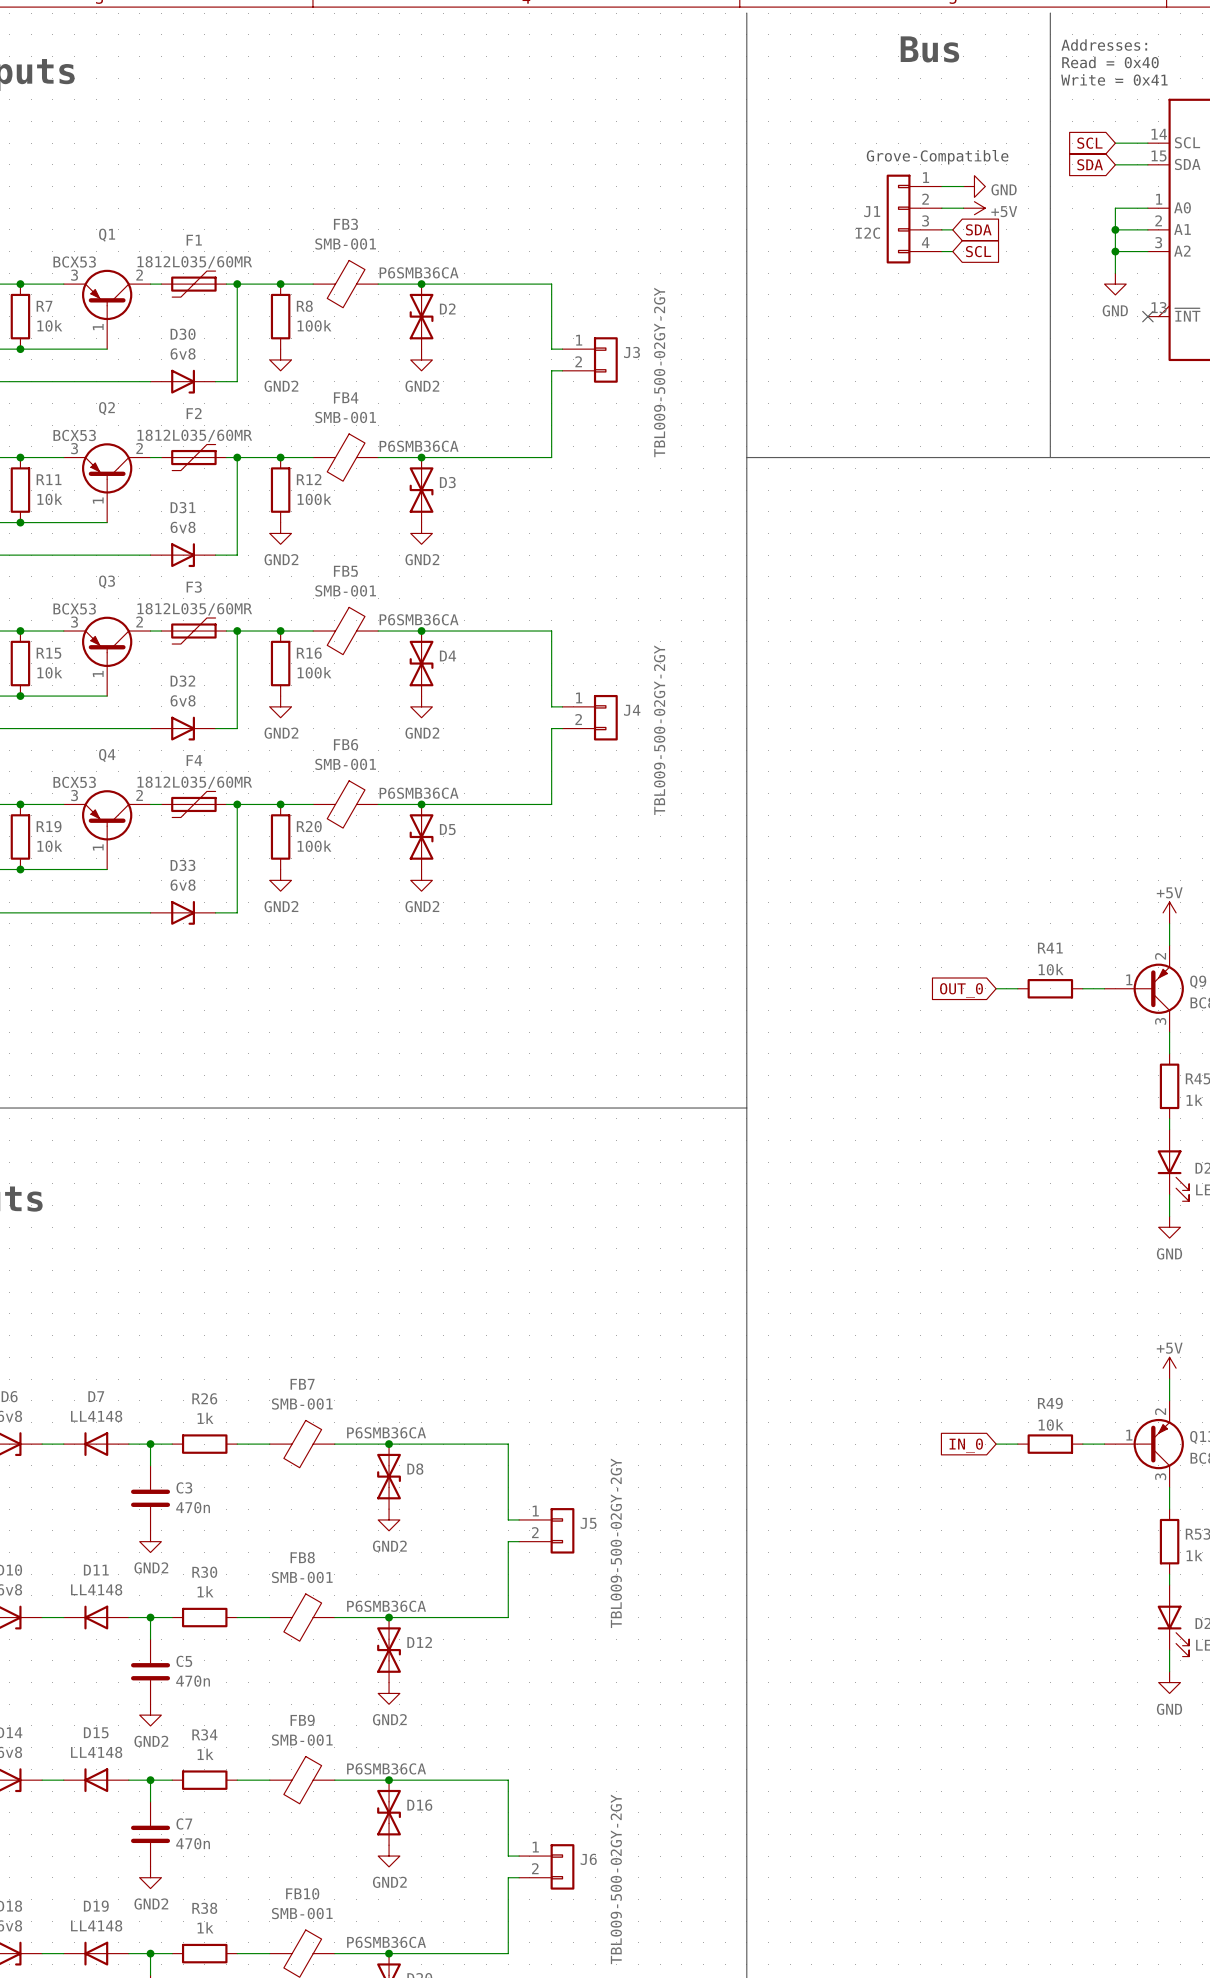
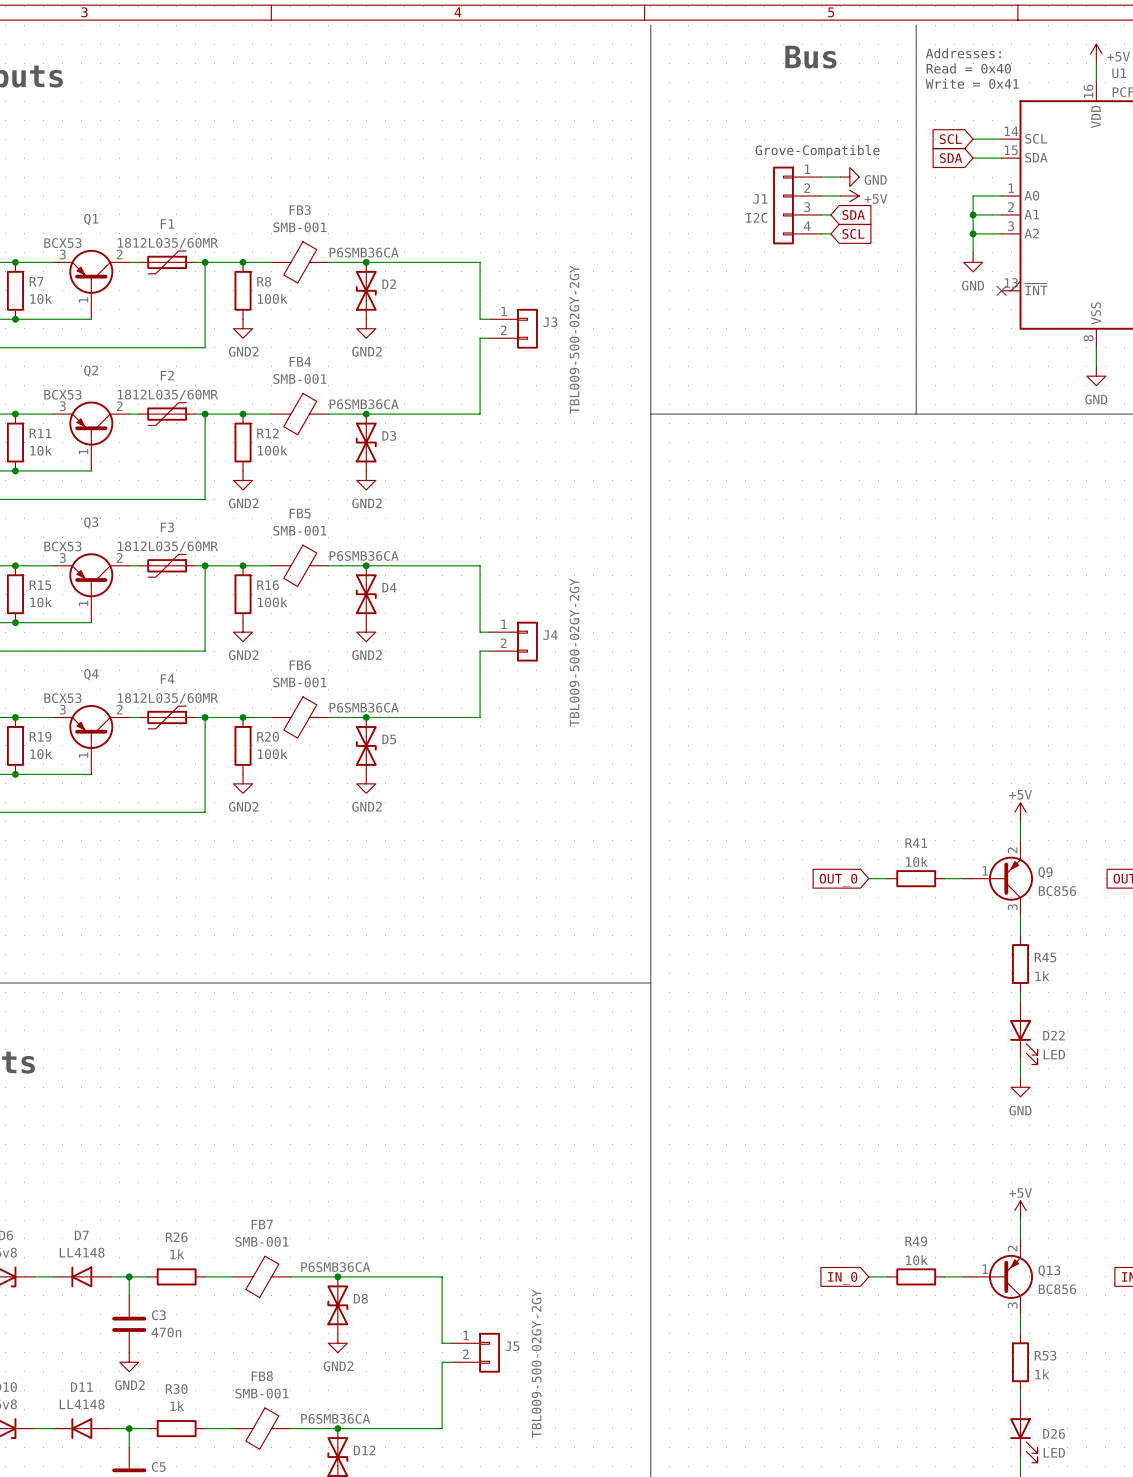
D30: 6v8 (183, 381) -> none
D31: 6v8 (183, 555) -> none
D32: 6v8 (183, 728) -> none
D33: 6v8 (183, 912) -> none

